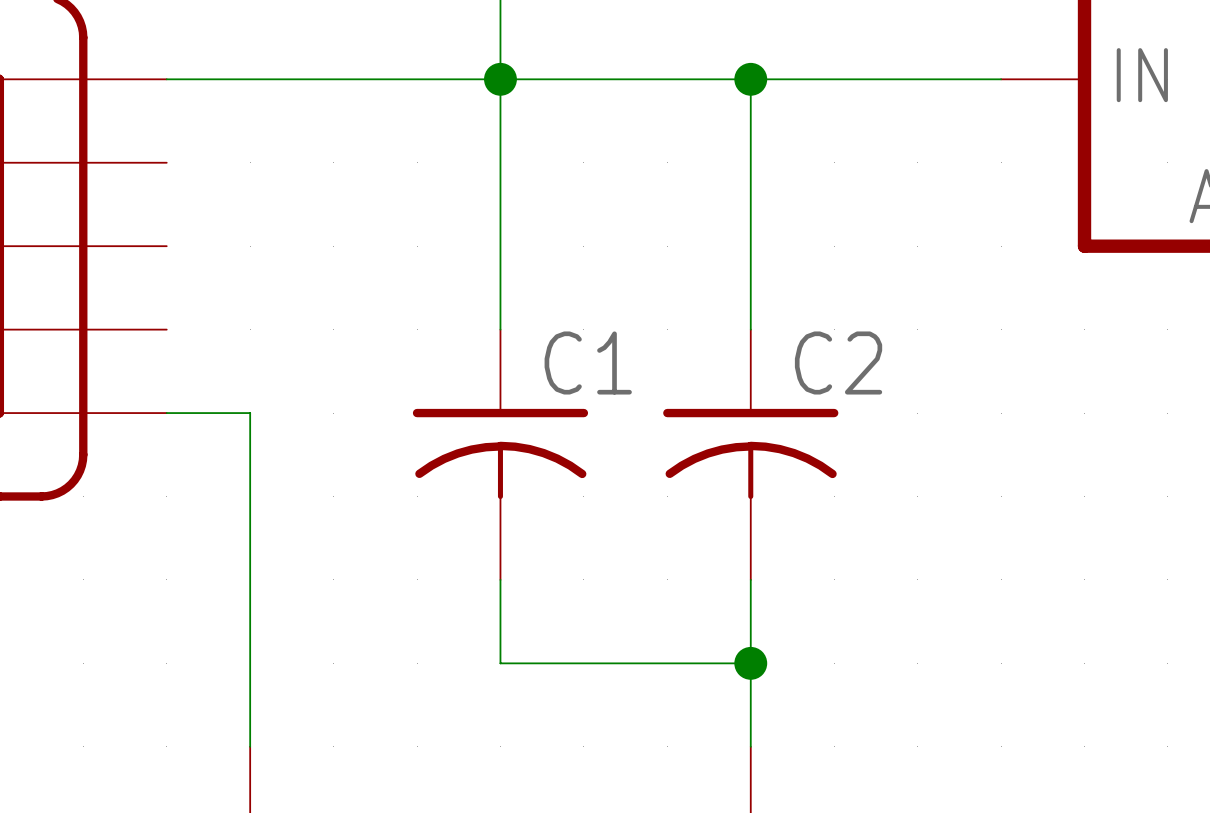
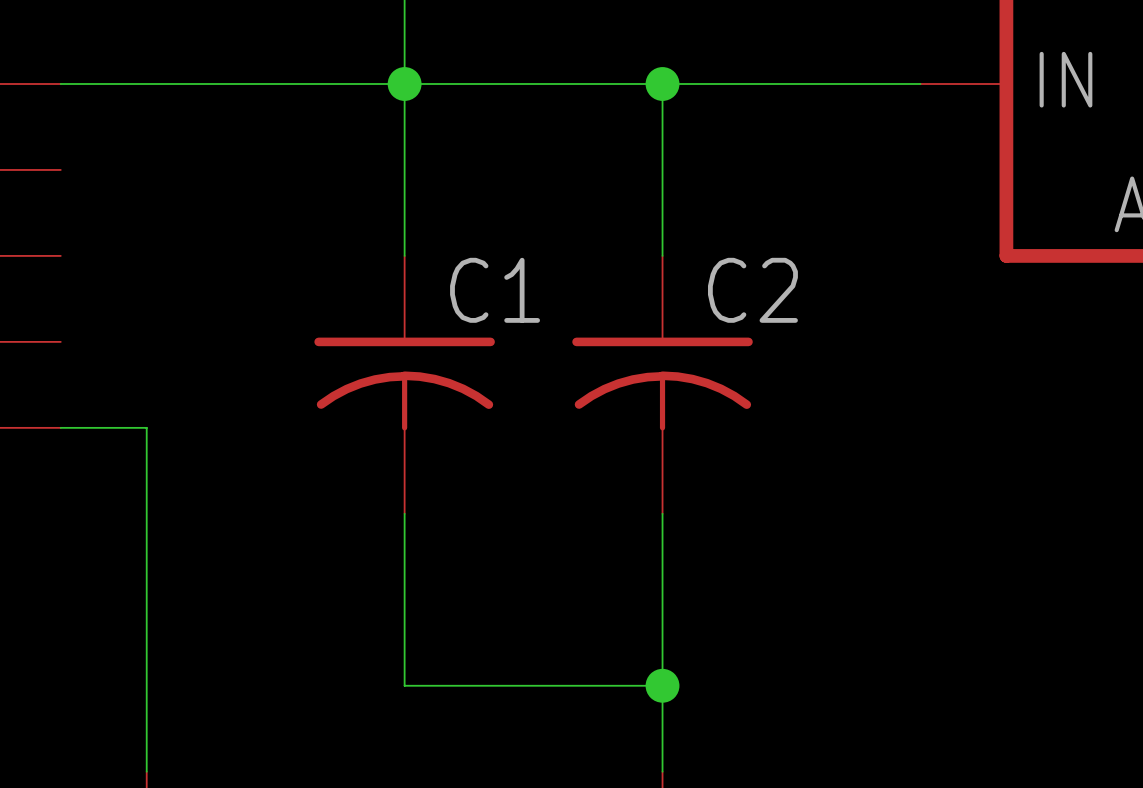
C1 position: (500, 454) -> (404, 384)
C2 position: (750, 454) -> (662, 384)

